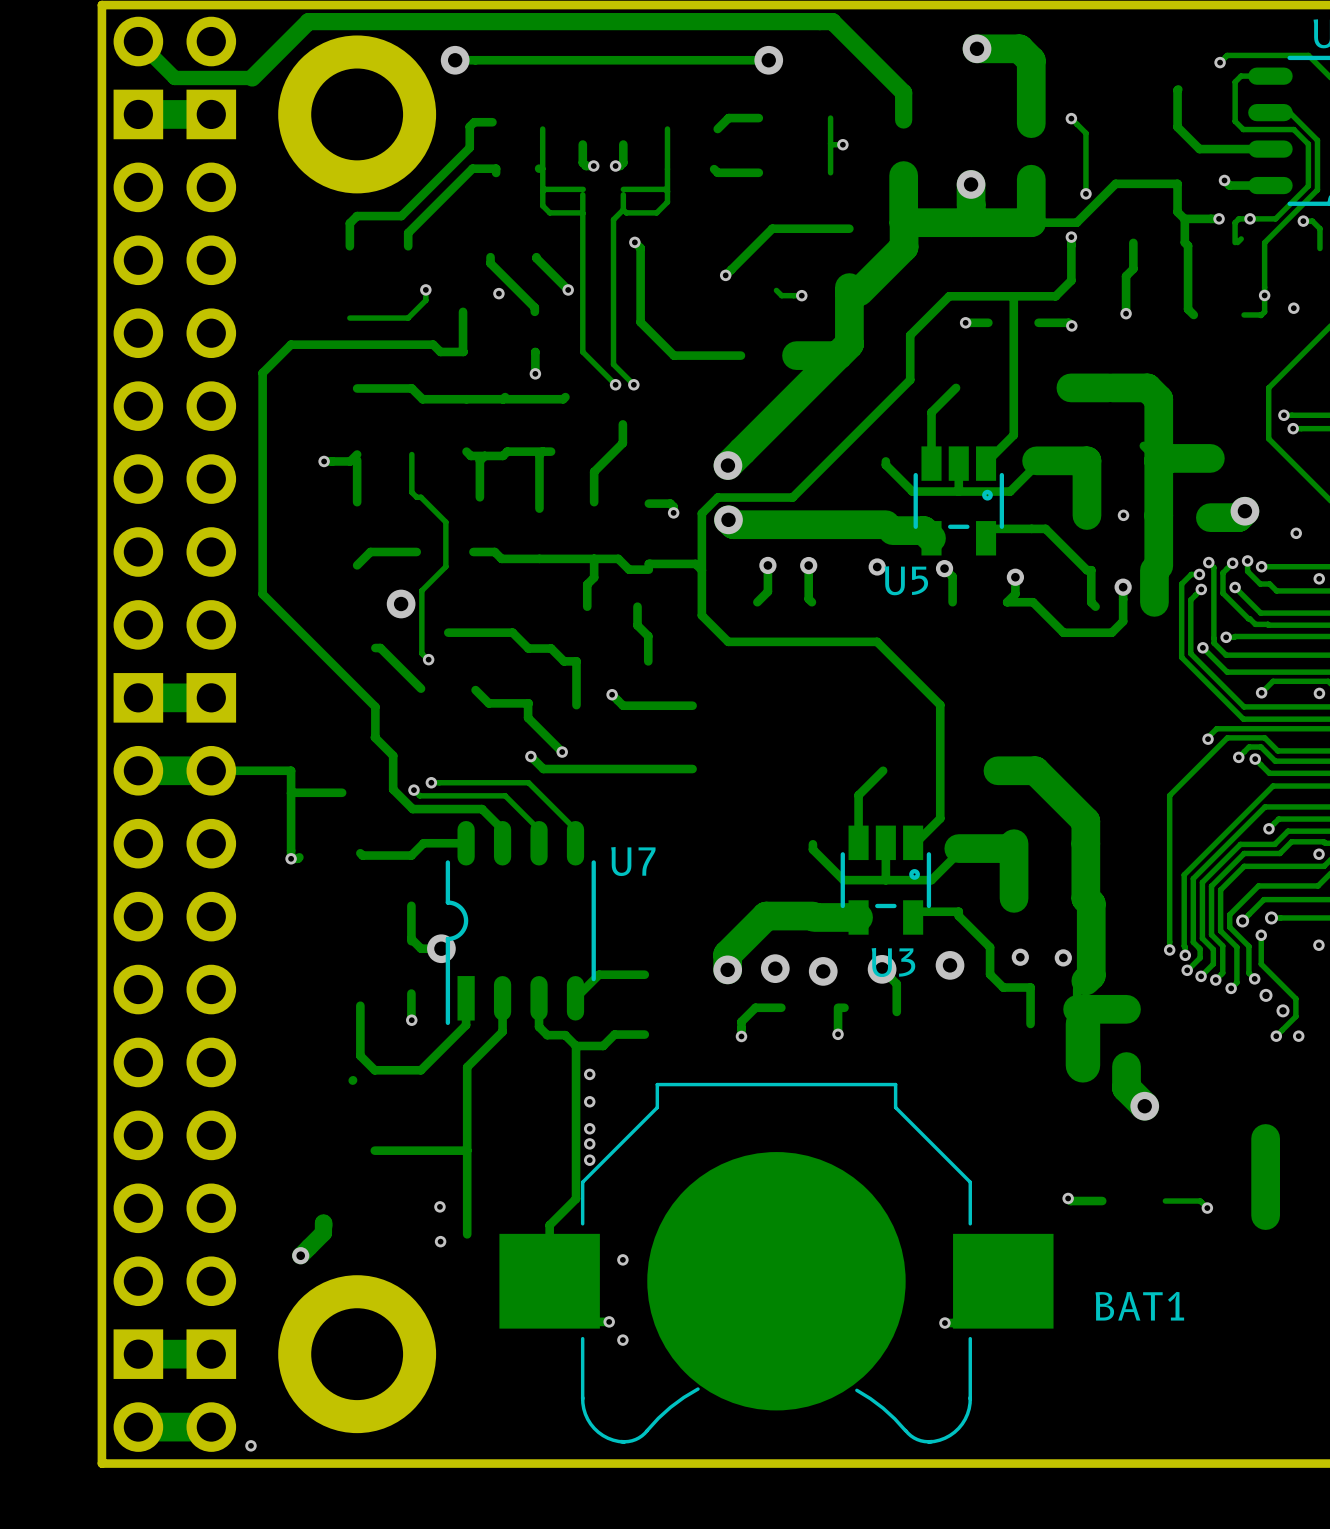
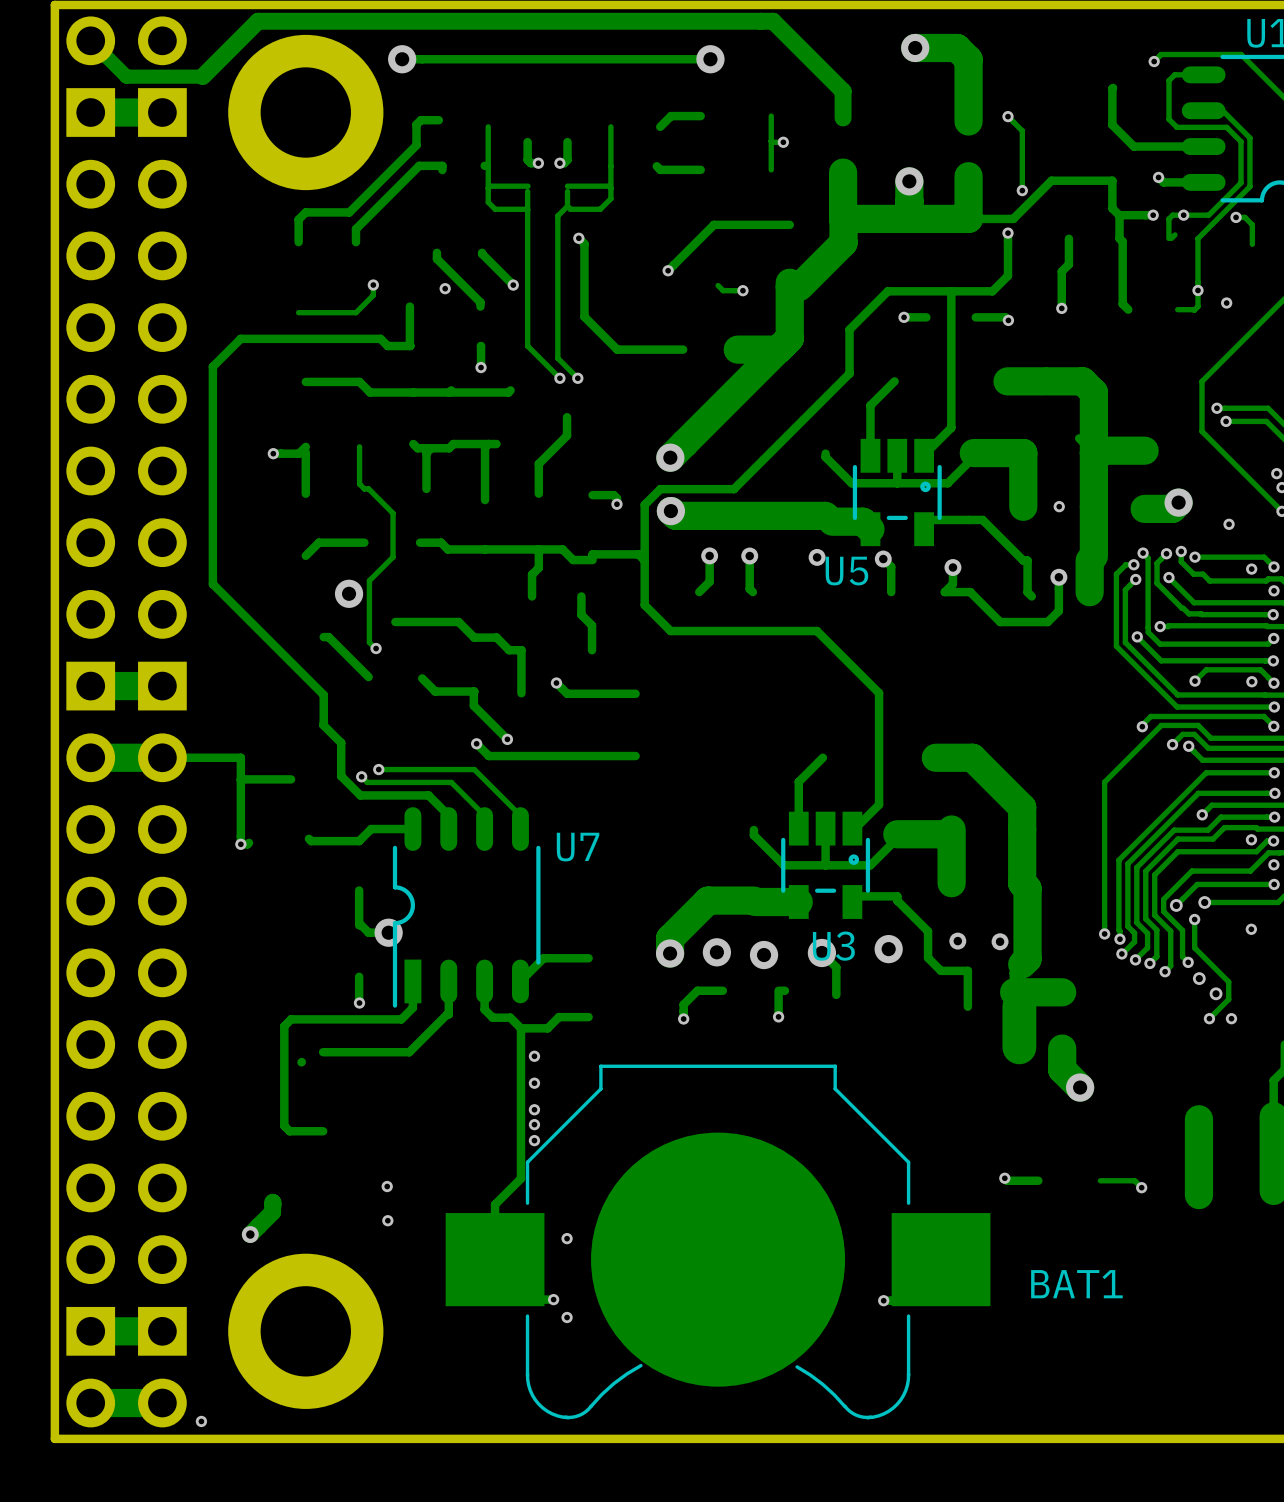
track: (360, 1005) (360, 1055) (374, 1070) -> none
track: (502, 1031) (467, 1067) (467, 1234) -> none
track: (454, 1036) (420, 1070) -> (448, 1014) (409, 1052) (368, 1052)
track: (467, 1150) (374, 1150) -> (401, 1019) (291, 1019) (284, 1026) (284, 1125) (289, 1131) (323, 1131)

